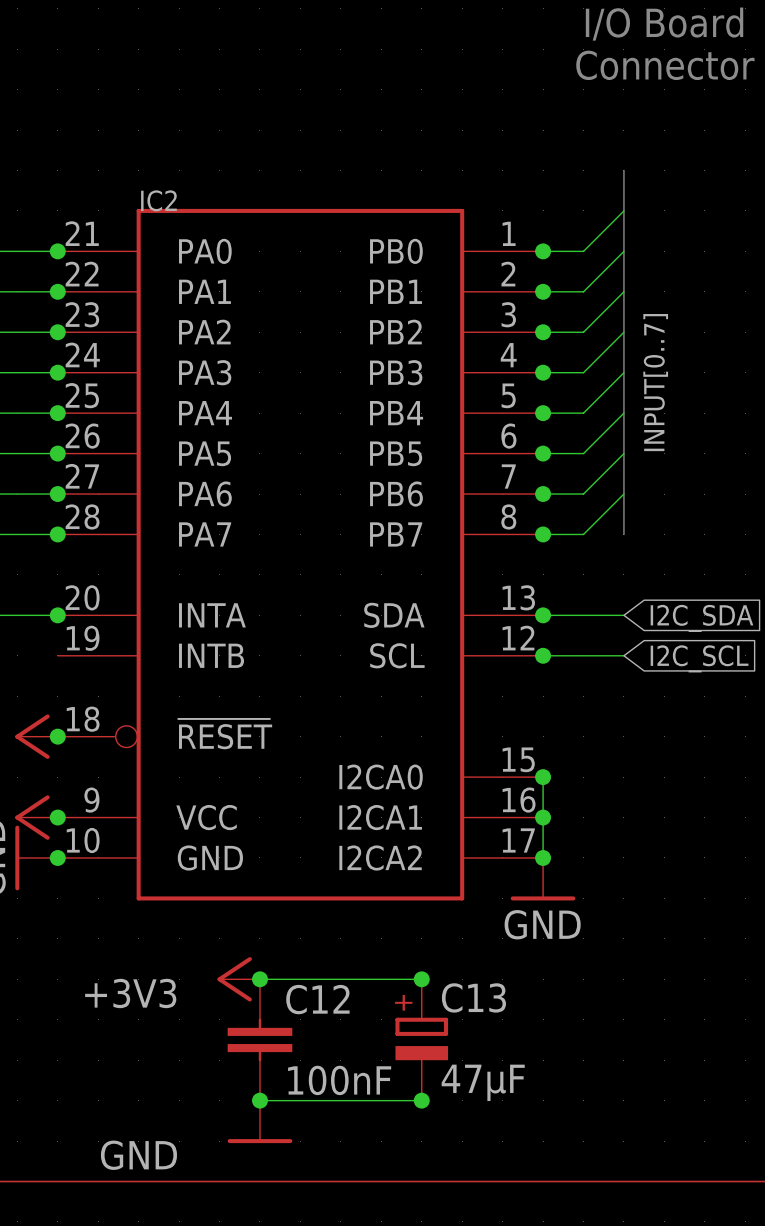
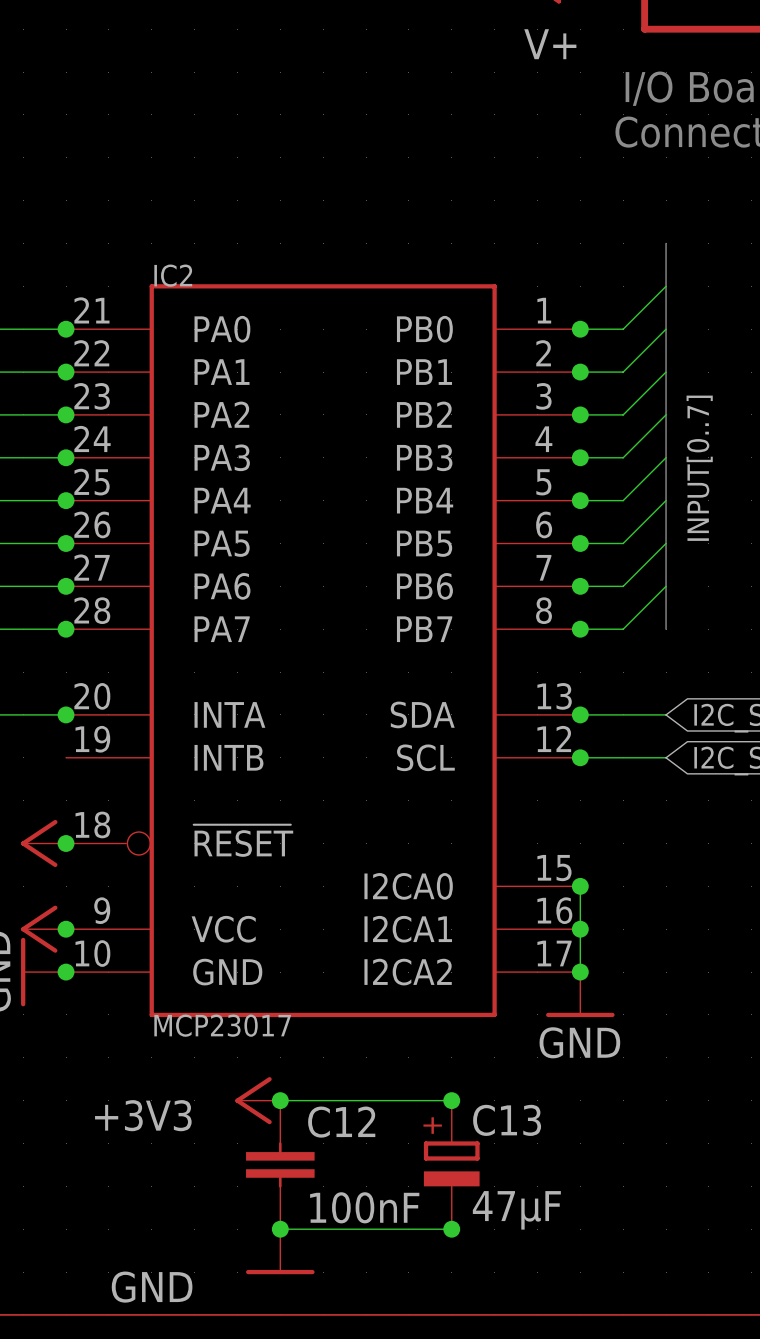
IC2 value: none -> MCP23017 (222, 1025)

